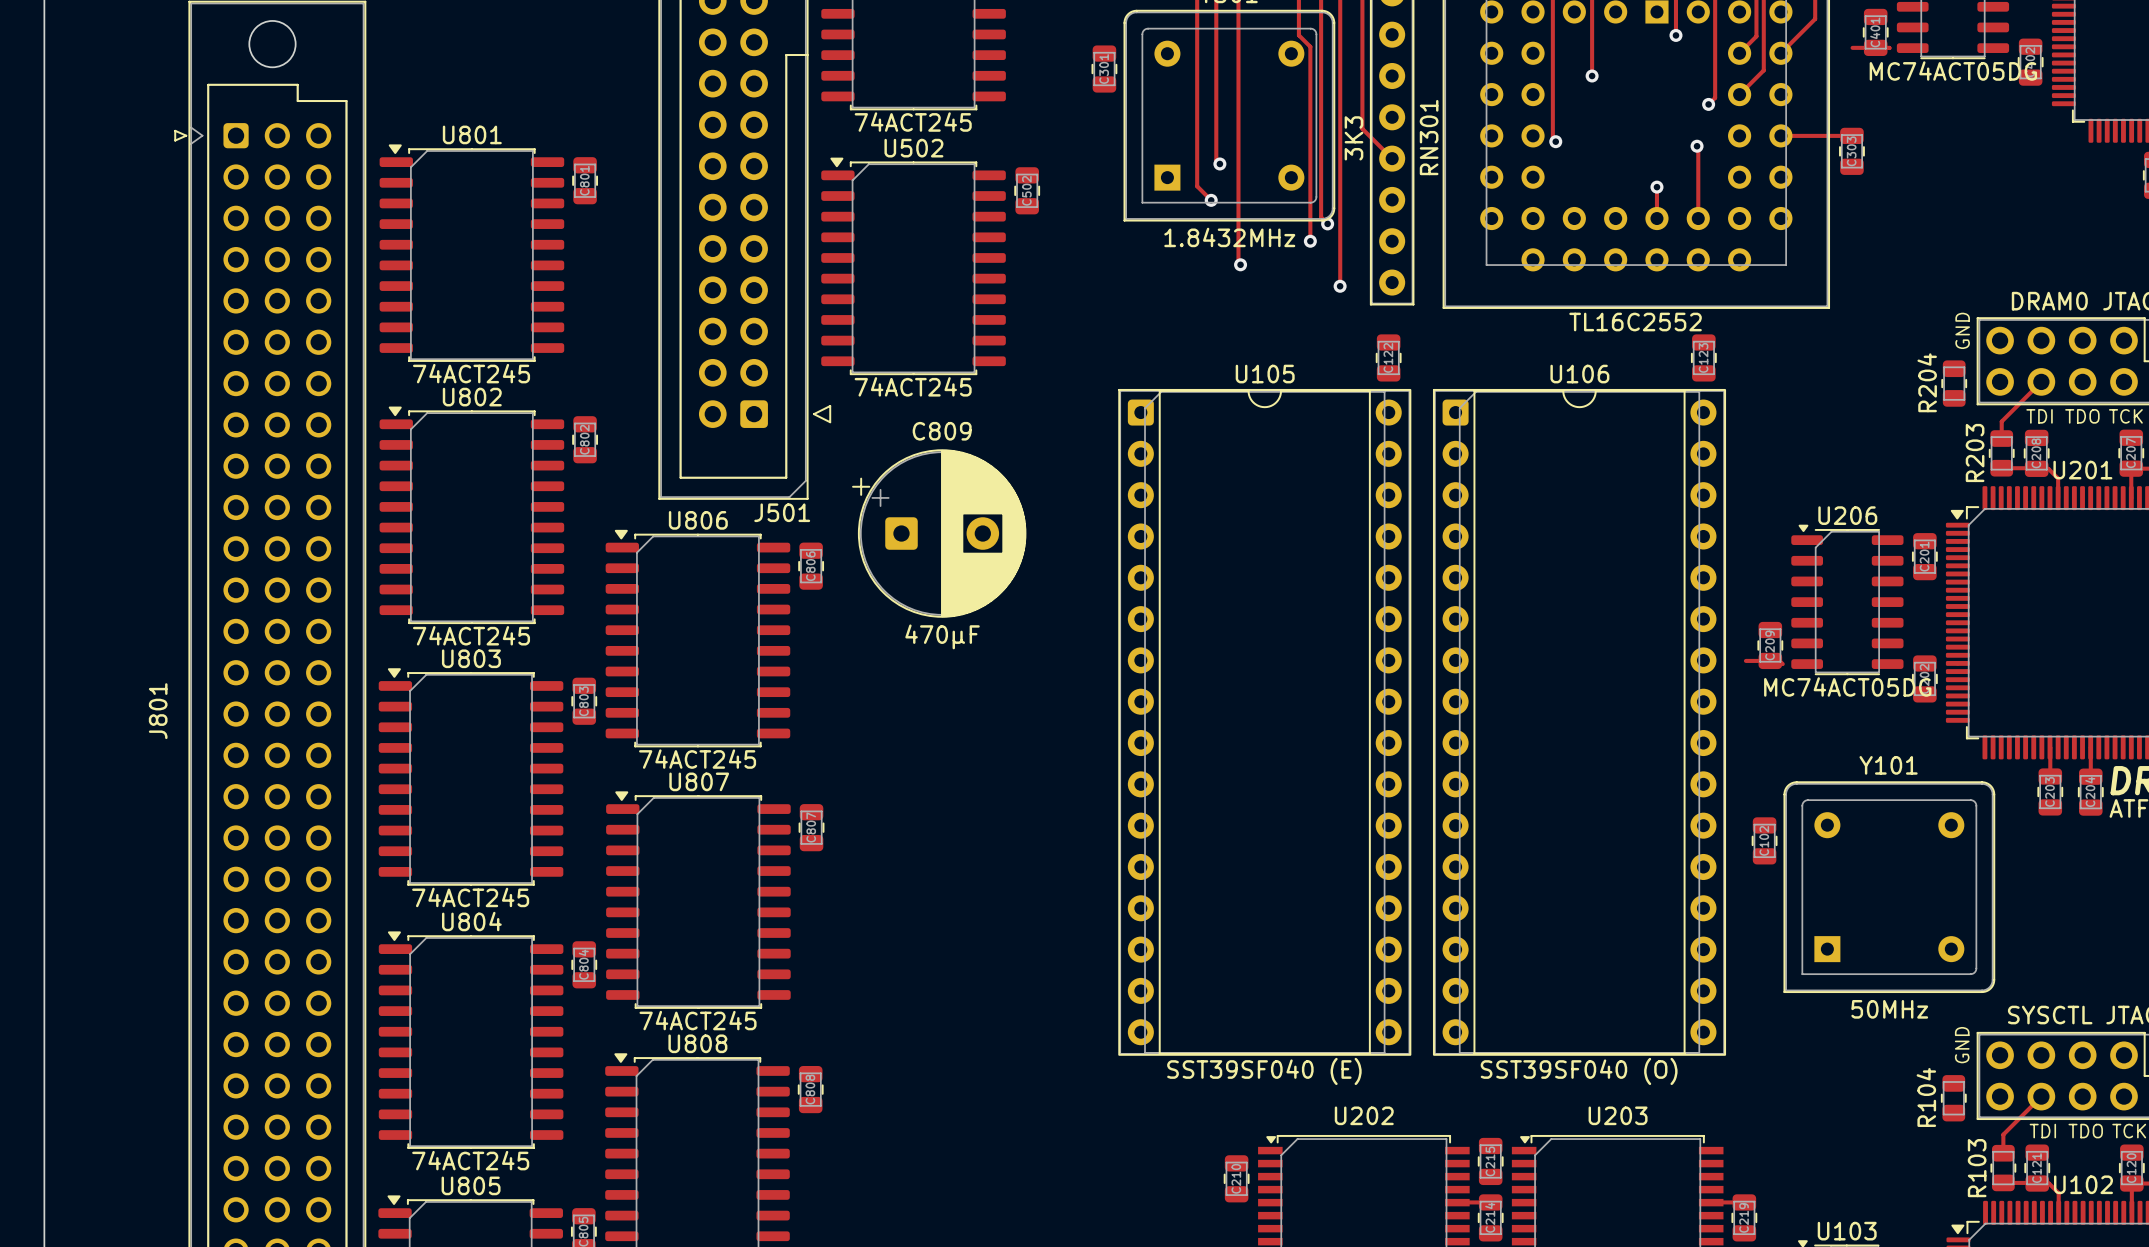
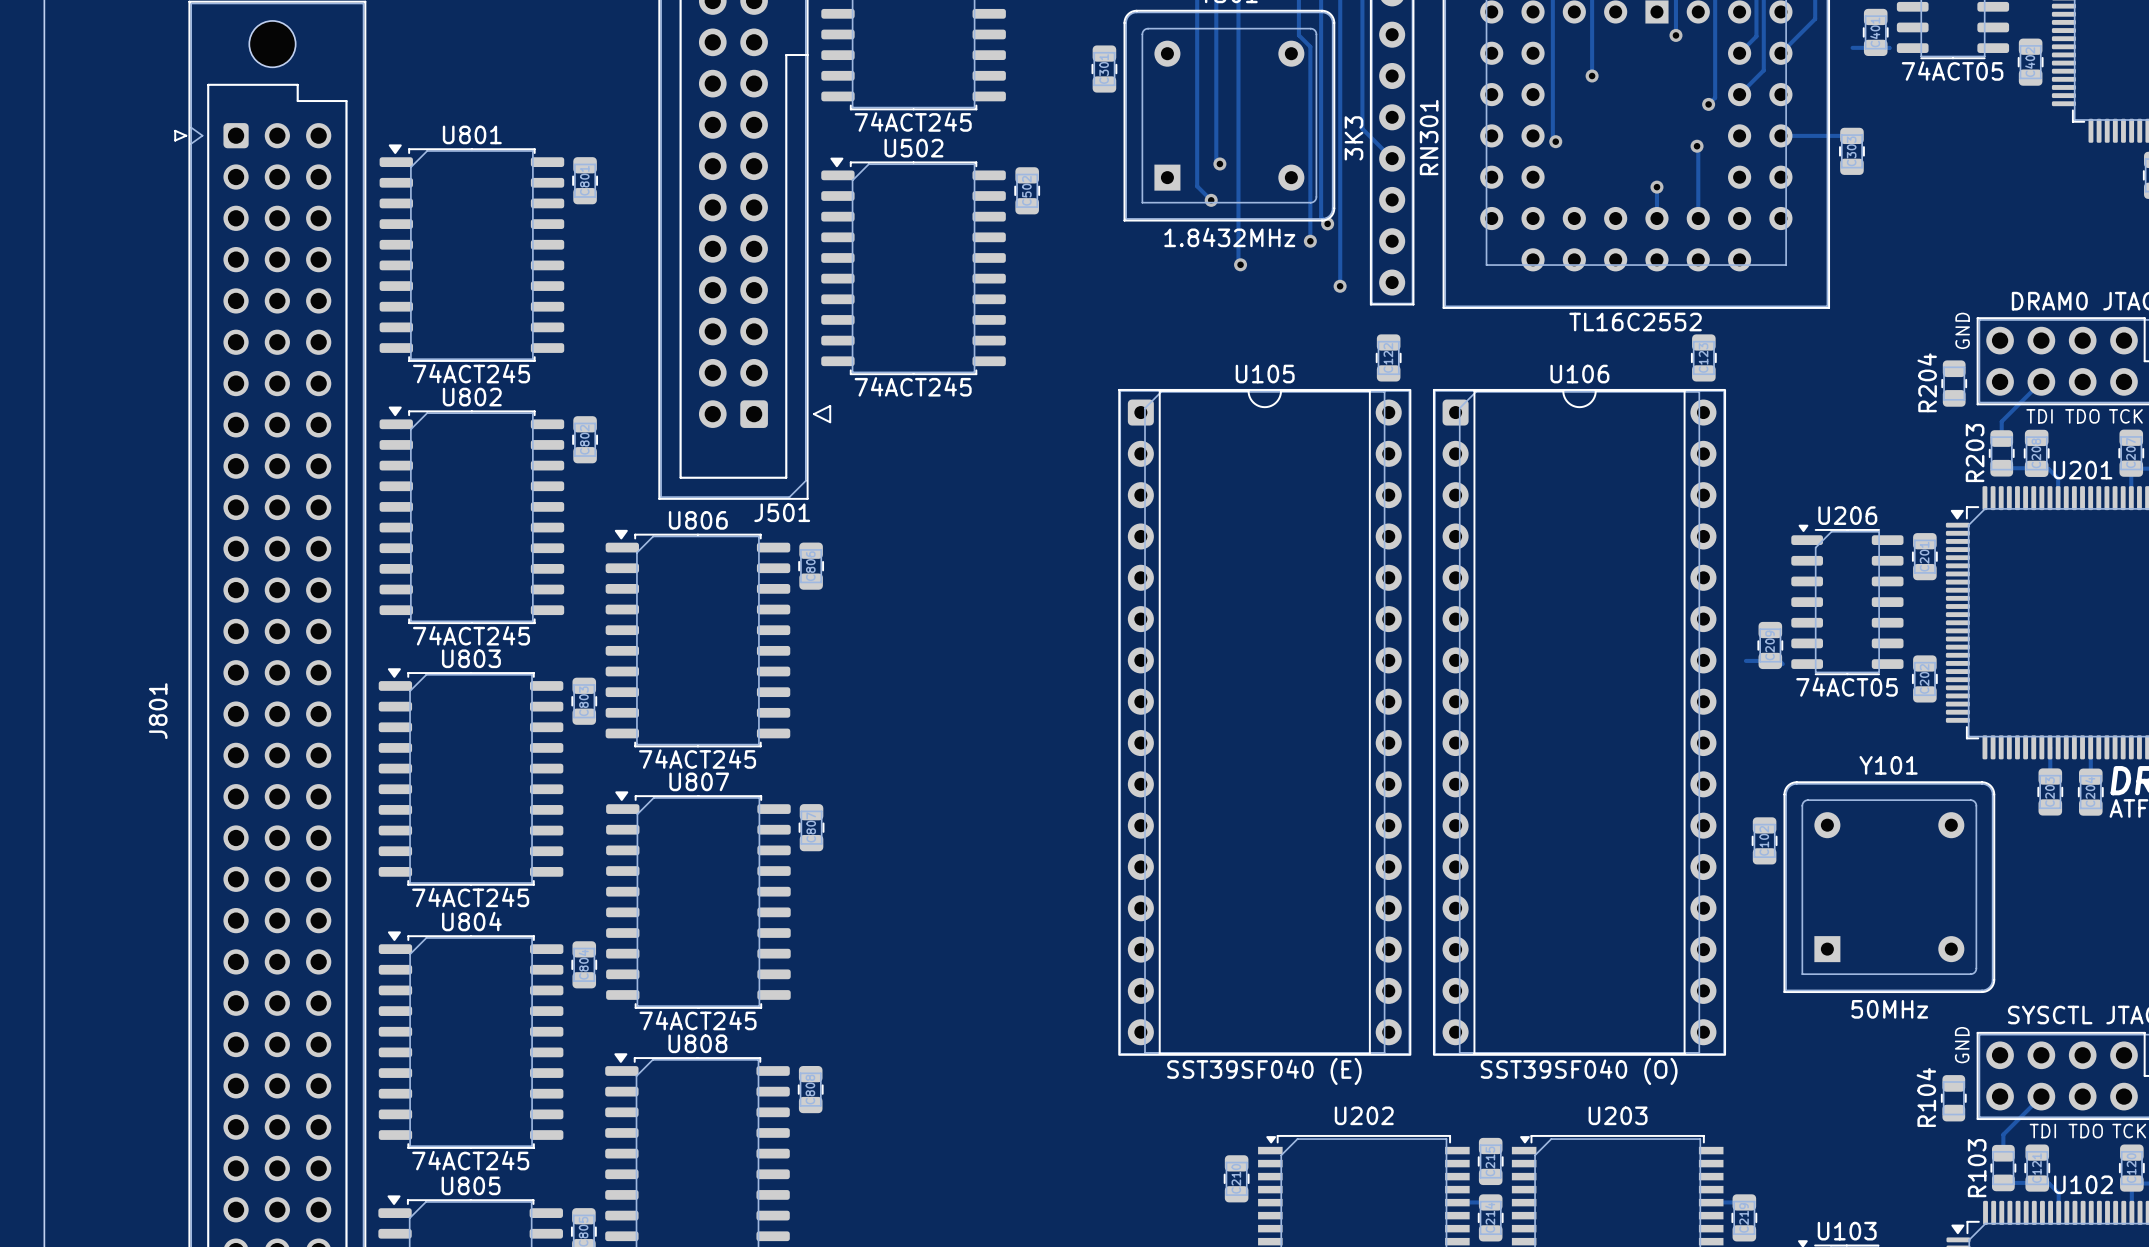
part value: MC74ACT05DG (1953, 71) -> 74ACT05 (1952, 71)
C809: 470µF (939, 533) -> none
U206 value: MC74ACT05DG (1847, 686) -> 74ACT05 (1847, 686)

